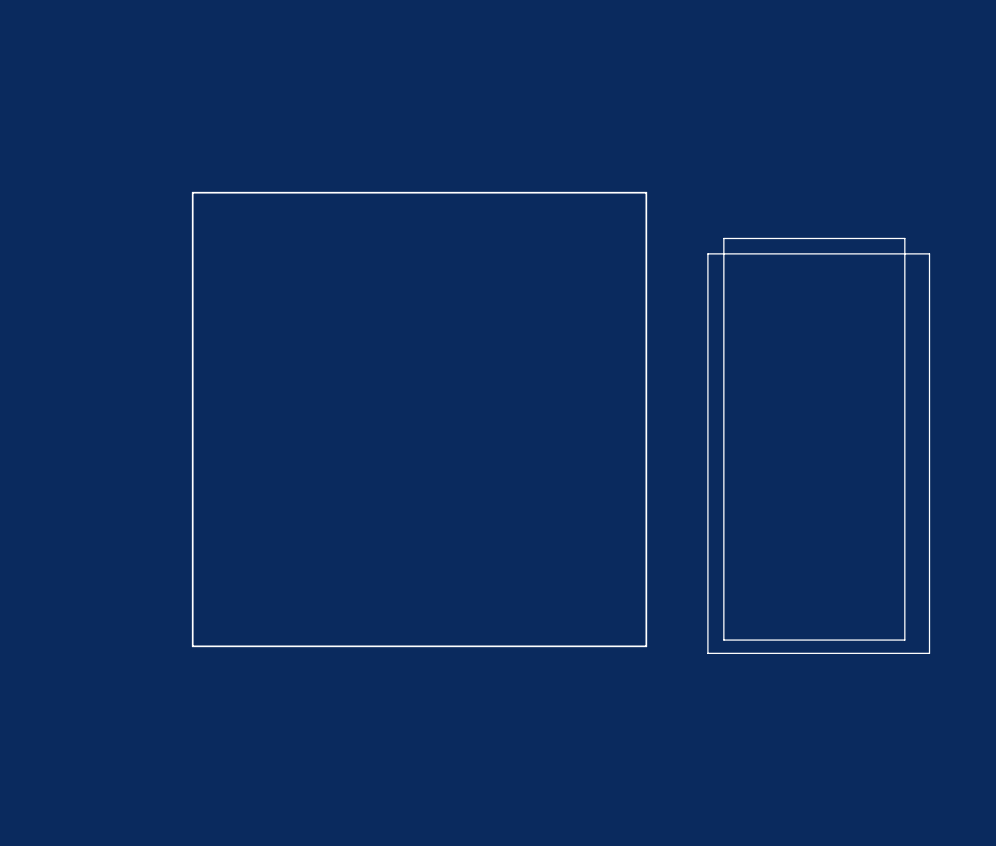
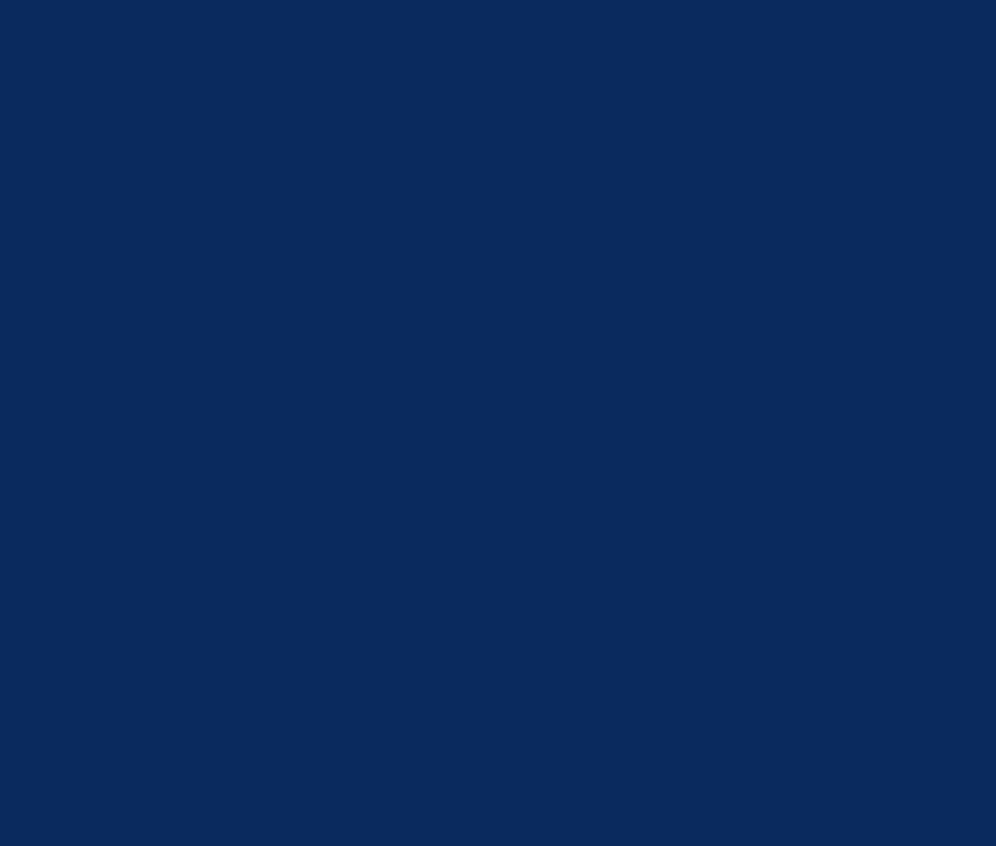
line: (192, 192) (646, 192) (646, 646) (192, 646) (192, 192) -> none
line: (723, 238) (904, 238) (904, 640) (723, 640) (723, 238) -> none
line: (707, 253) (929, 253) (929, 653) (707, 653) (707, 253) -> none

